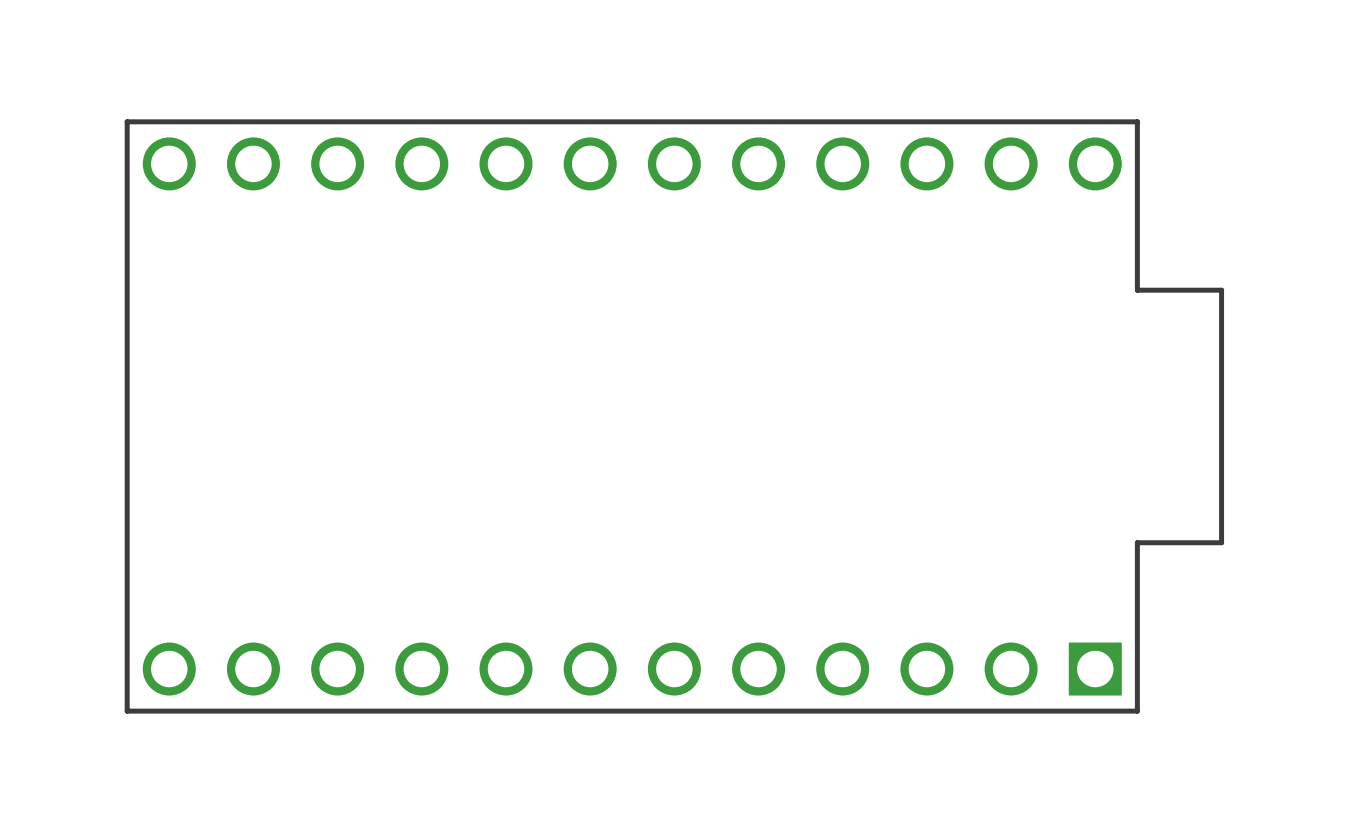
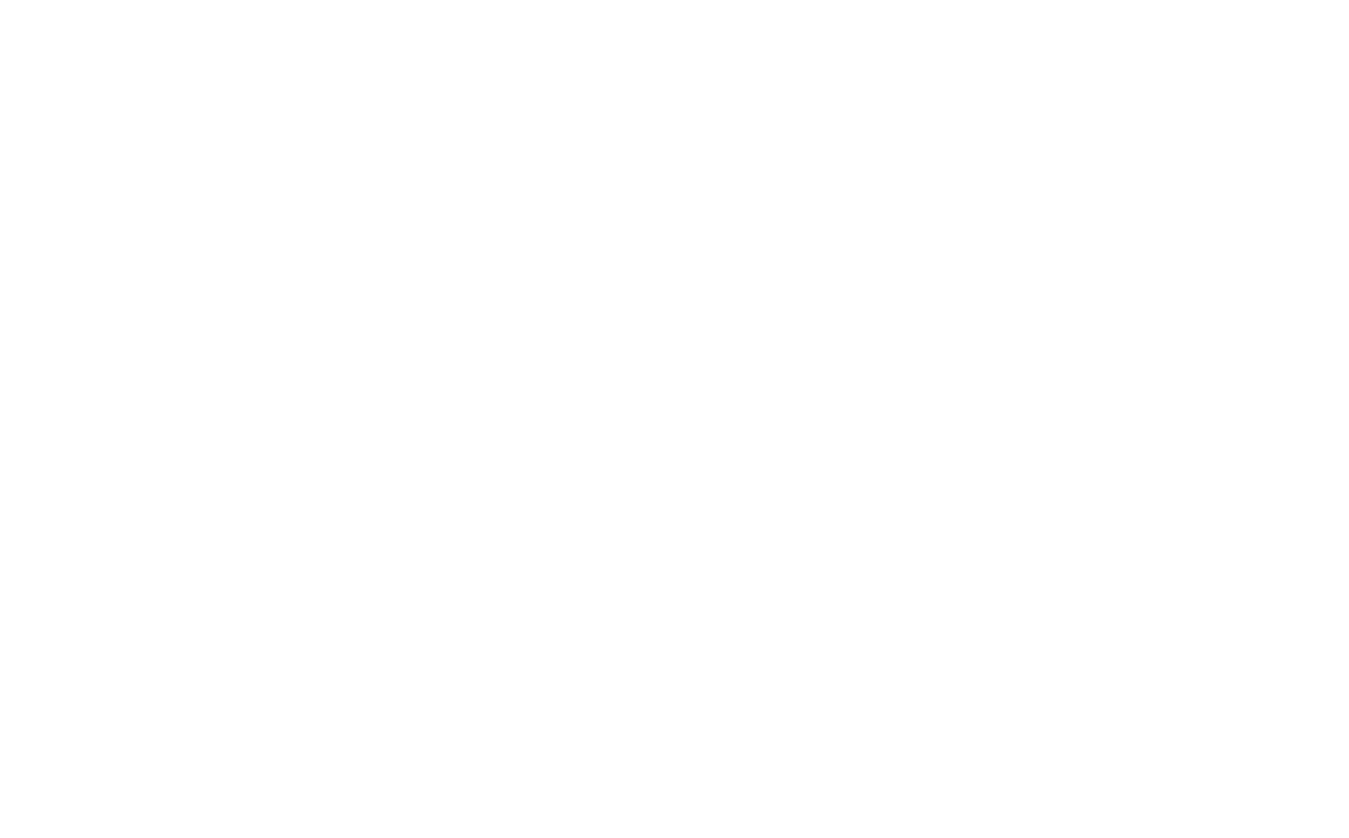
part: (674, 416) -> none

